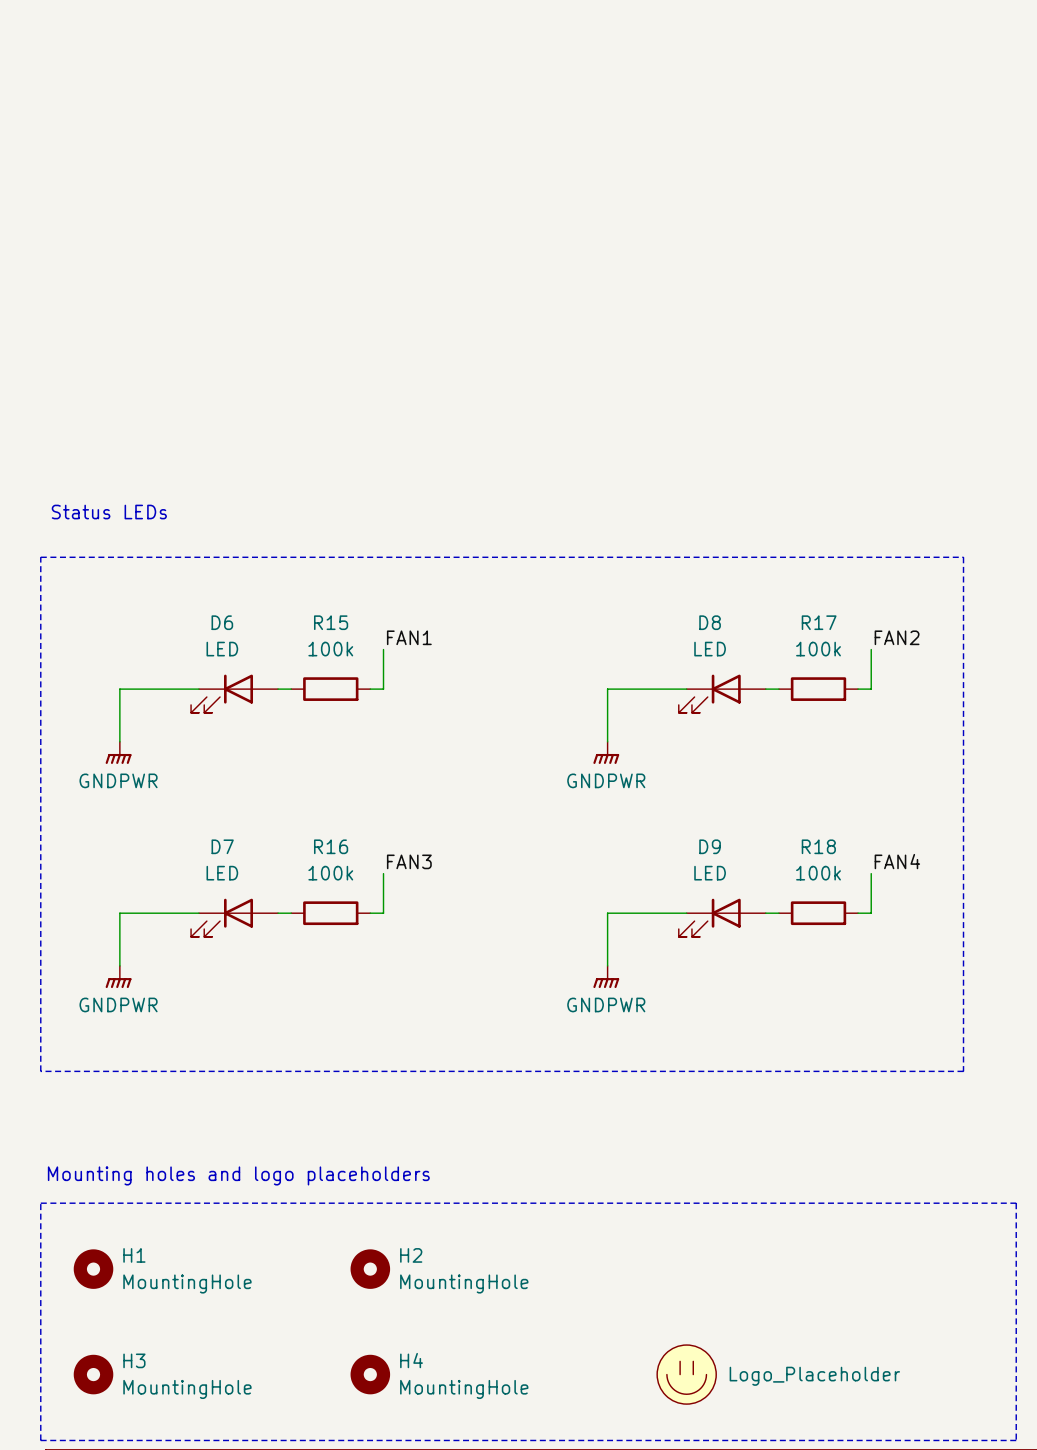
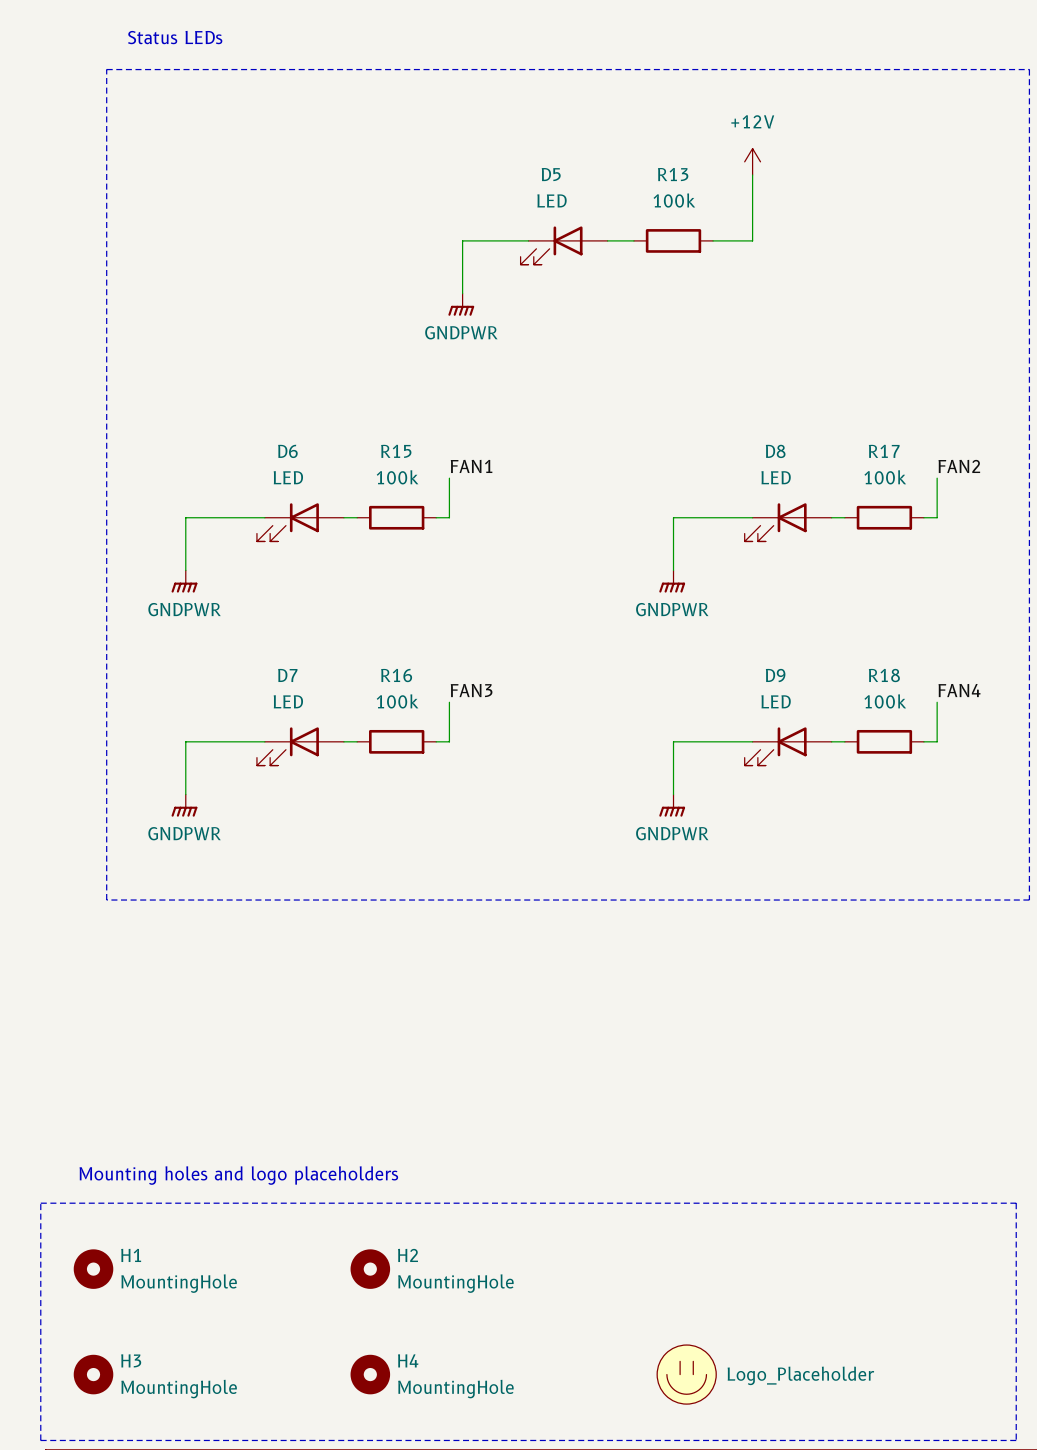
text: none -> Status LEDs (175, 37)
line: none -> (106, 69) (1029, 69) (1029, 900) (106, 900) (106, 69)
power symbol: none -> +12V (752, 161)
wire: none -> (752, 175) (752, 240) (713, 240)
wire: none -> (528, 240) (462, 240) (462, 293)
wire: none -> (607, 240) (633, 240)
R13: none -> 100k (673, 240)
D5: none -> LED (564, 245)
power symbol: none -> GNDPWR (461, 304)
text: Status LEDs (109, 512) -> none
line: (40, 557) (963, 557) (963, 1071) (40, 1071) (40, 557) -> none
power symbol: none -> GNDPWR (184, 581)
power symbol: none -> GNDPWR (672, 581)
label position: FAN1 (409, 637) -> FAN1 (471, 466)
label position: FAN2 (897, 637) -> FAN2 (959, 466)
wire: (383, 649) (383, 689) (370, 689) -> (449, 478) (449, 517) (436, 517)
wire: (871, 649) (871, 689) (858, 689) -> (937, 478) (937, 517) (923, 517)
wire: (198, 689) (119, 689) (119, 741) -> (264, 517) (185, 517) (185, 570)
wire: (278, 689) (291, 689) -> (343, 517) (357, 517)
R15 position: (330, 689) -> (396, 517)
wire: (686, 689) (607, 689) (607, 741) -> (752, 517) (673, 517) (673, 570)
wire: (765, 689) (778, 689) -> (831, 517) (844, 517)
R17 position: (818, 689) -> (884, 517)
D6 position: (234, 693) -> (300, 522)
D8 position: (722, 693) -> (788, 522)
power symbol position: GNDPWR (118, 752) -> GNDPWR (184, 805)
power symbol position: GNDPWR (606, 752) -> GNDPWR (672, 805)
label position: FAN3 (409, 861) -> FAN3 (471, 690)
label position: FAN4 (897, 861) -> FAN4 (959, 690)
wire: (383, 873) (383, 913) (370, 913) -> (449, 702) (449, 741) (436, 741)
wire: (871, 873) (871, 913) (858, 913) -> (937, 702) (937, 741) (923, 741)
wire: (198, 913) (119, 913) (119, 965) -> (264, 741) (185, 741) (185, 794)
wire: (278, 913) (291, 913) -> (343, 741) (357, 741)
R16 position: (330, 913) -> (396, 741)
wire: (686, 913) (607, 913) (607, 965) -> (752, 741) (673, 741) (673, 794)
wire: (765, 913) (778, 913) -> (831, 741) (844, 741)
R18 position: (818, 913) -> (884, 741)
D7 position: (234, 917) -> (300, 746)
D9 position: (722, 917) -> (788, 746)
power symbol: GNDPWR (118, 977) -> none
power symbol: GNDPWR (606, 977) -> none

